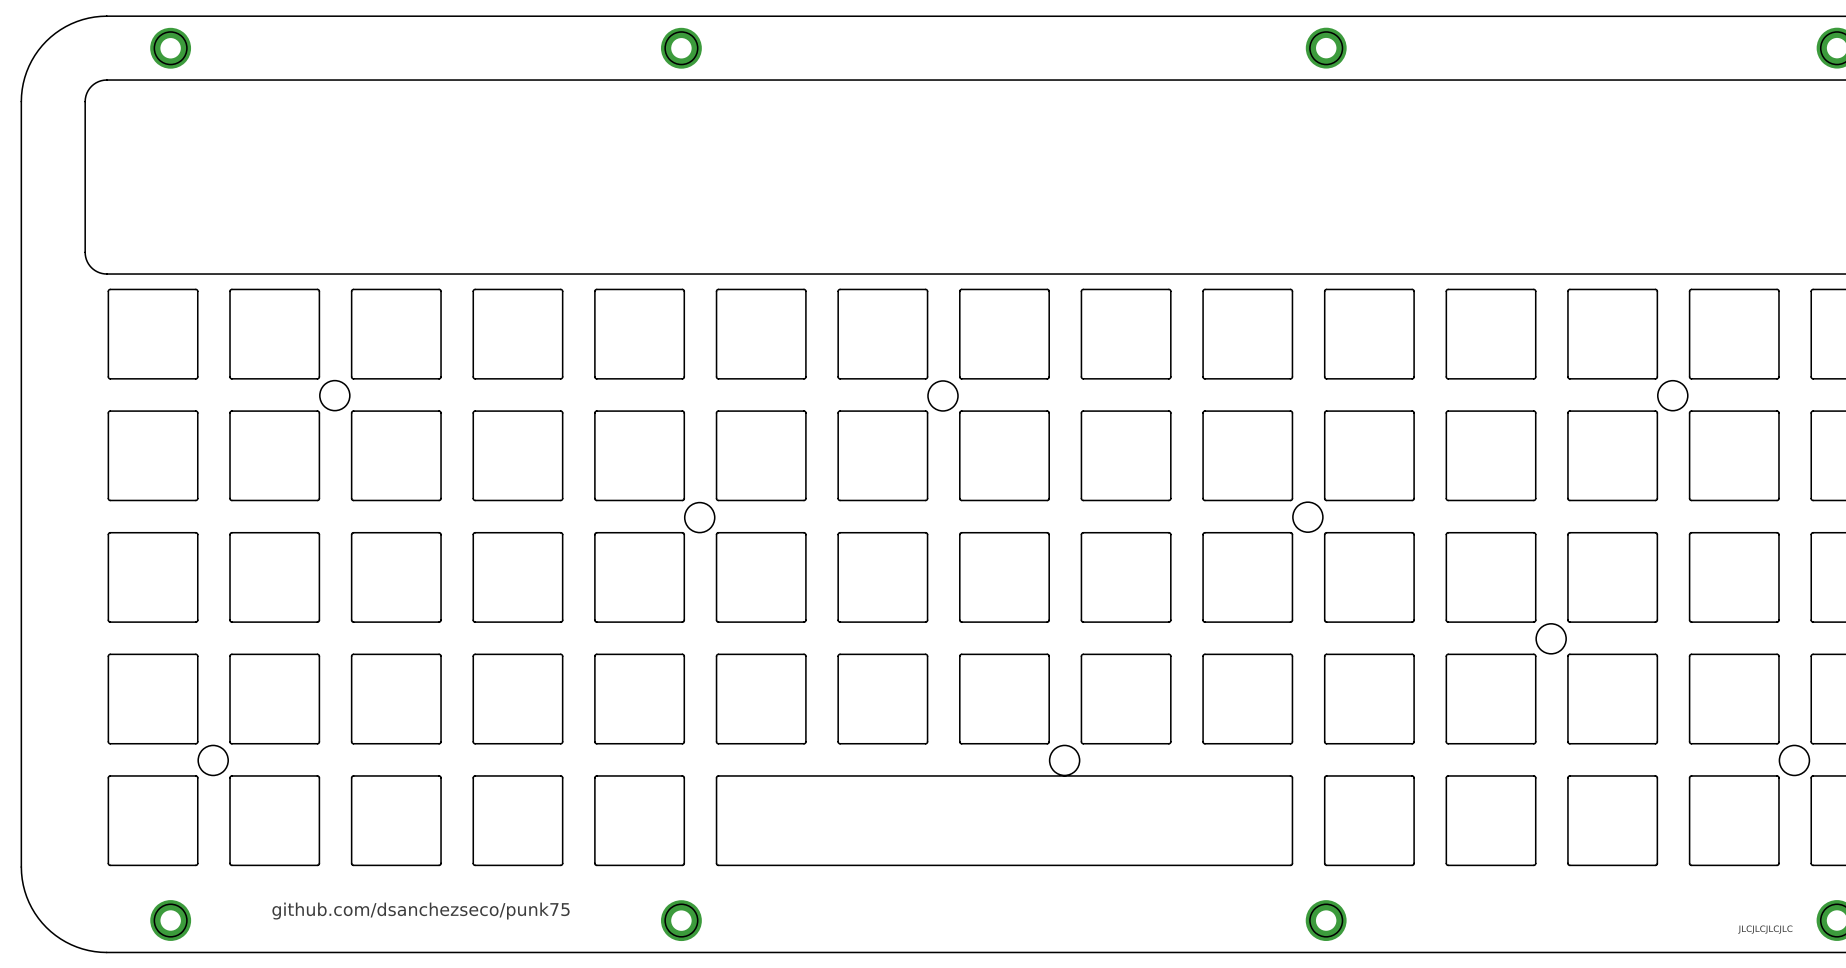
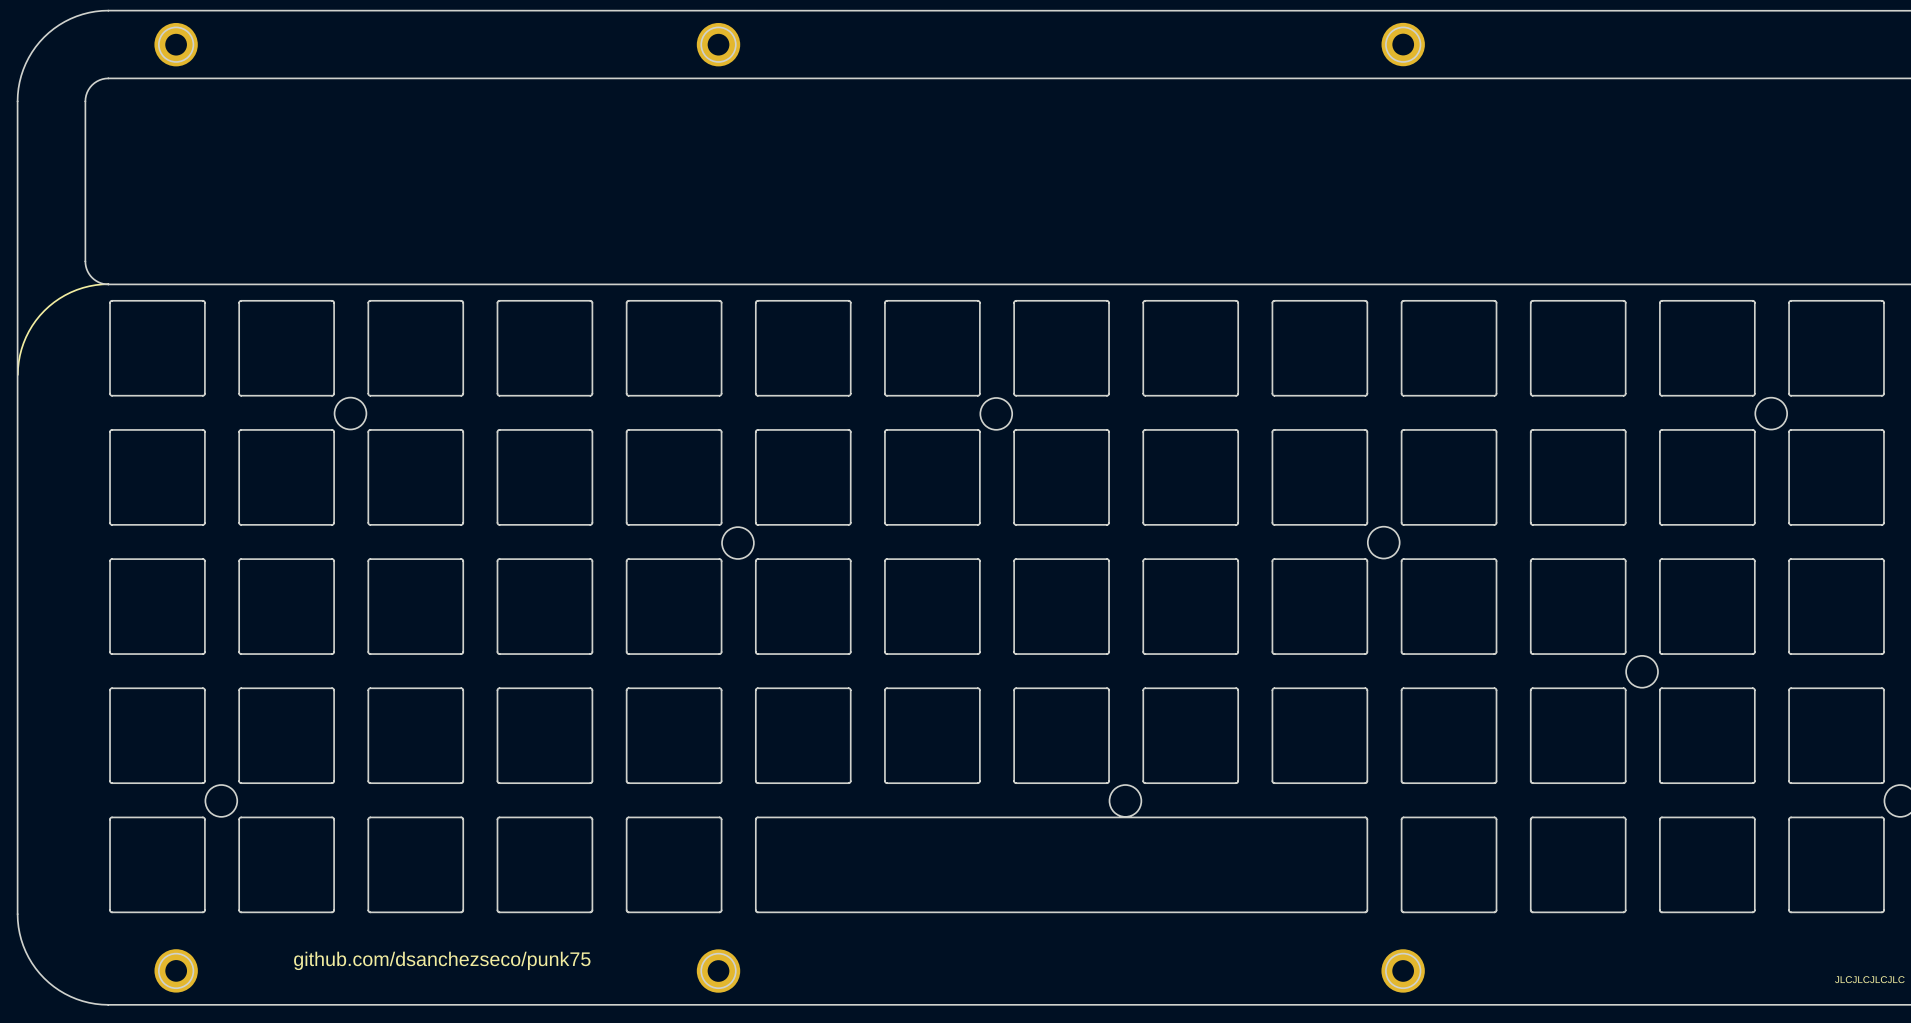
line: none -> (108, 284) (89, 286) (70, 292) (44, 310) (32, 325) (23, 343) (17, 374)

